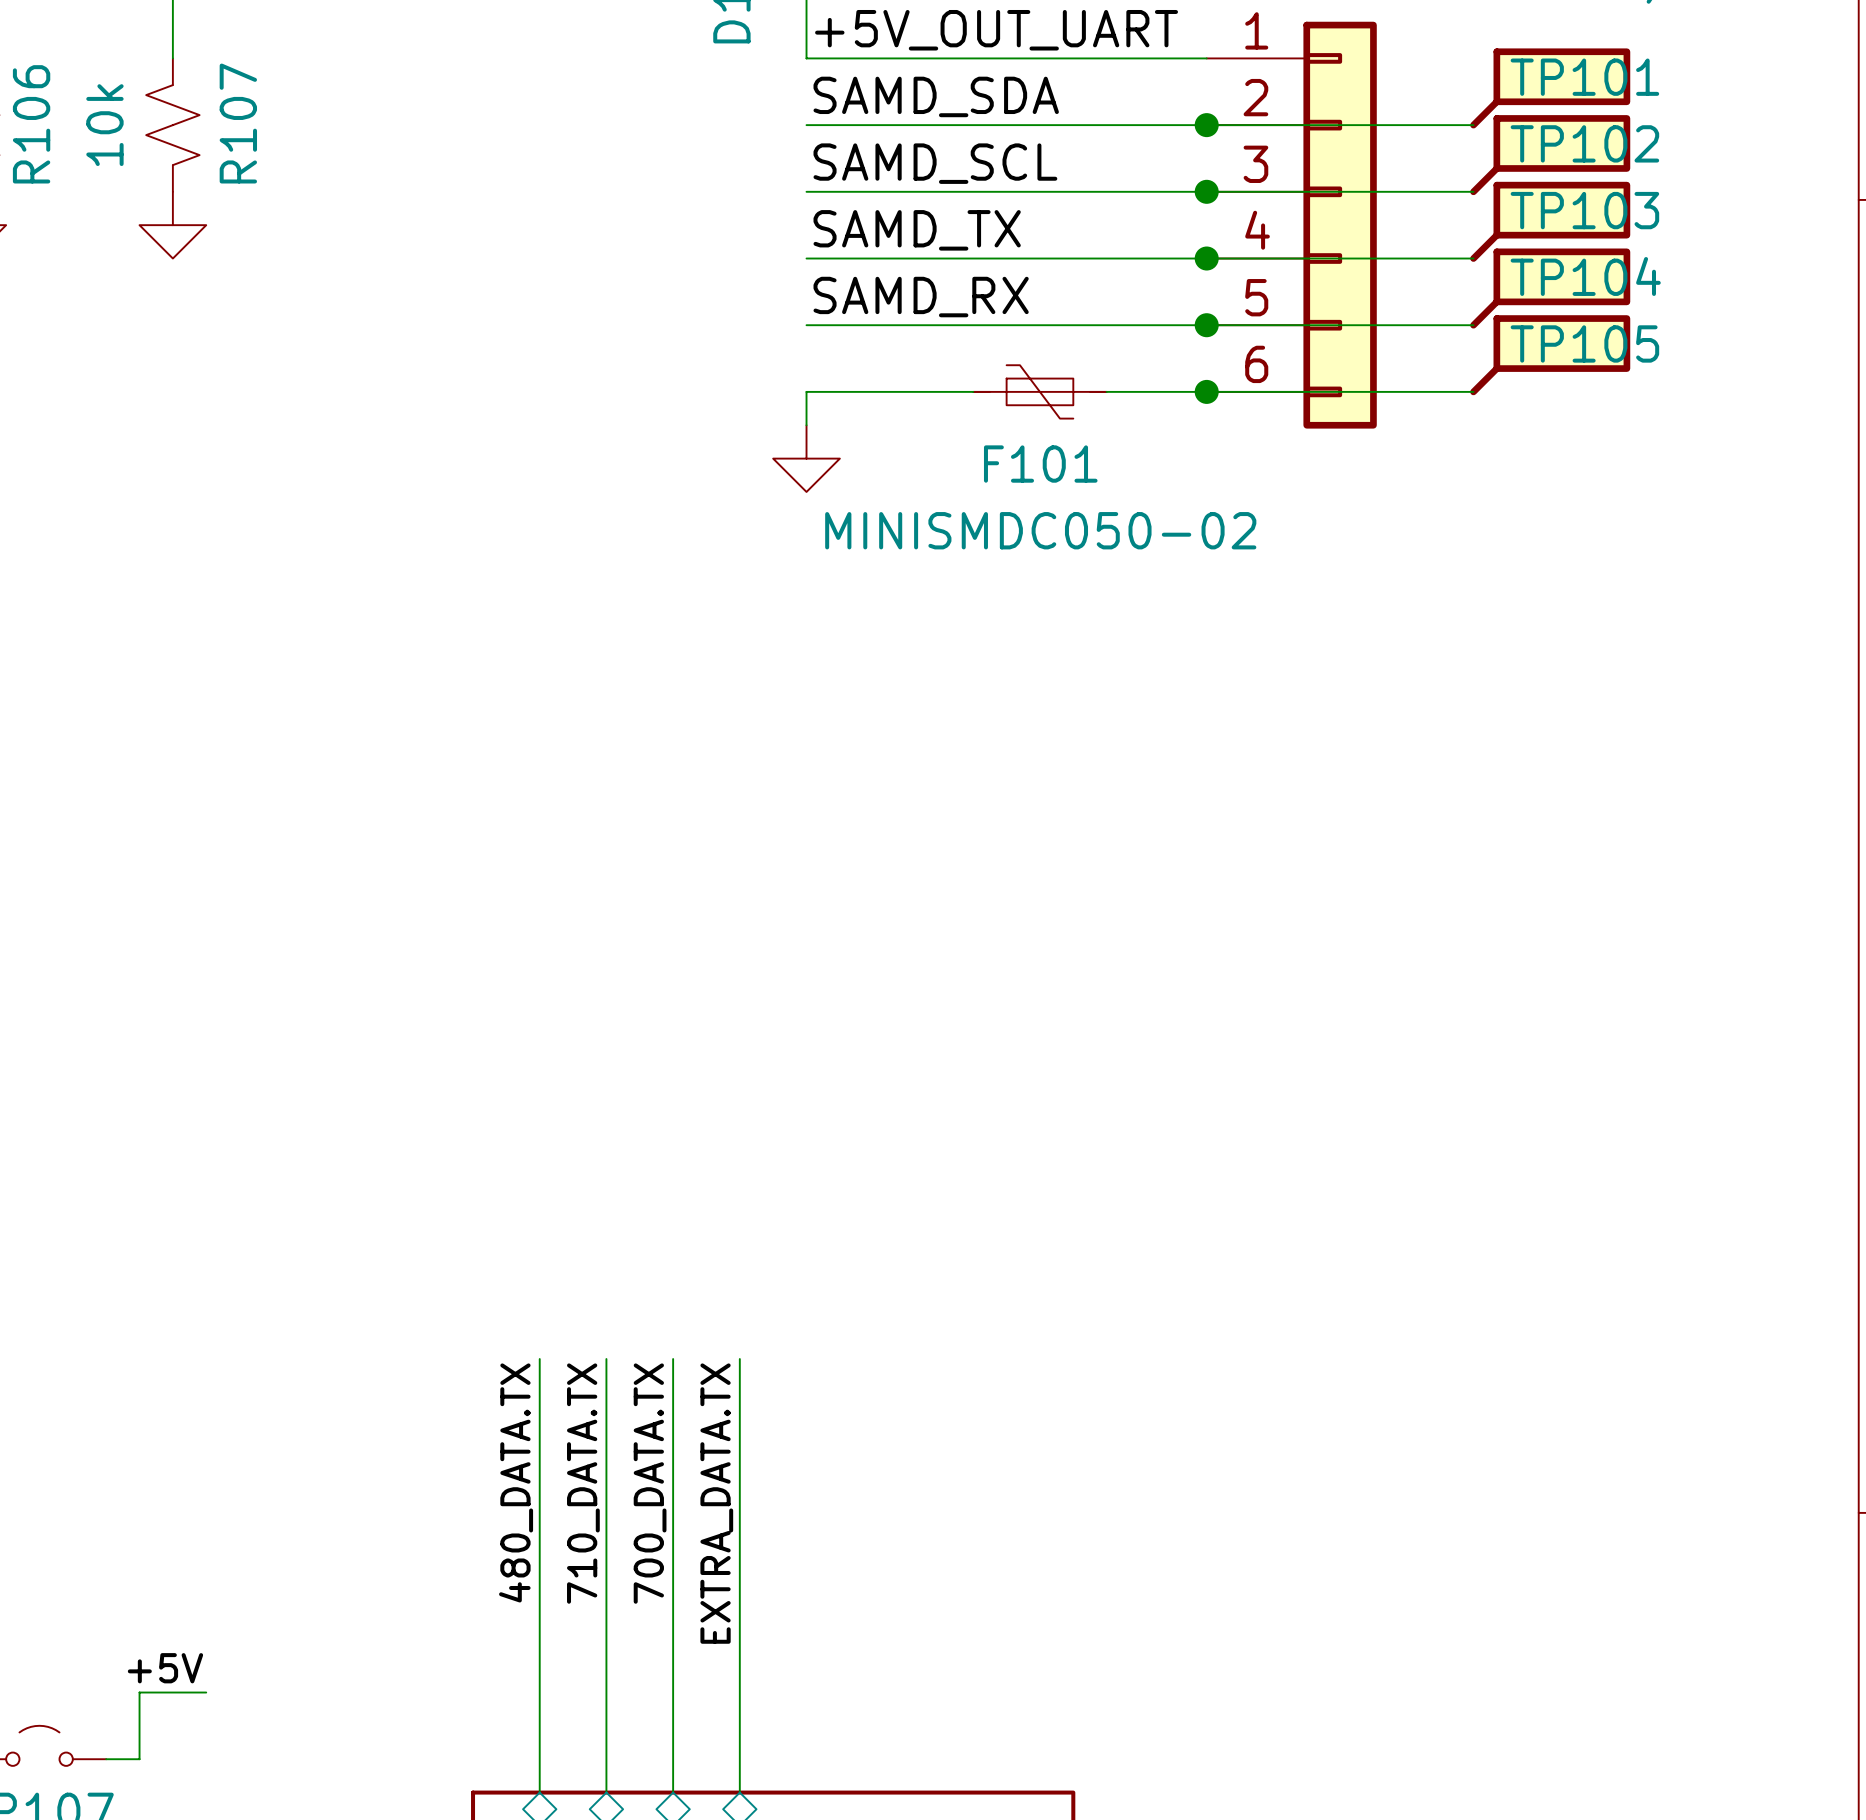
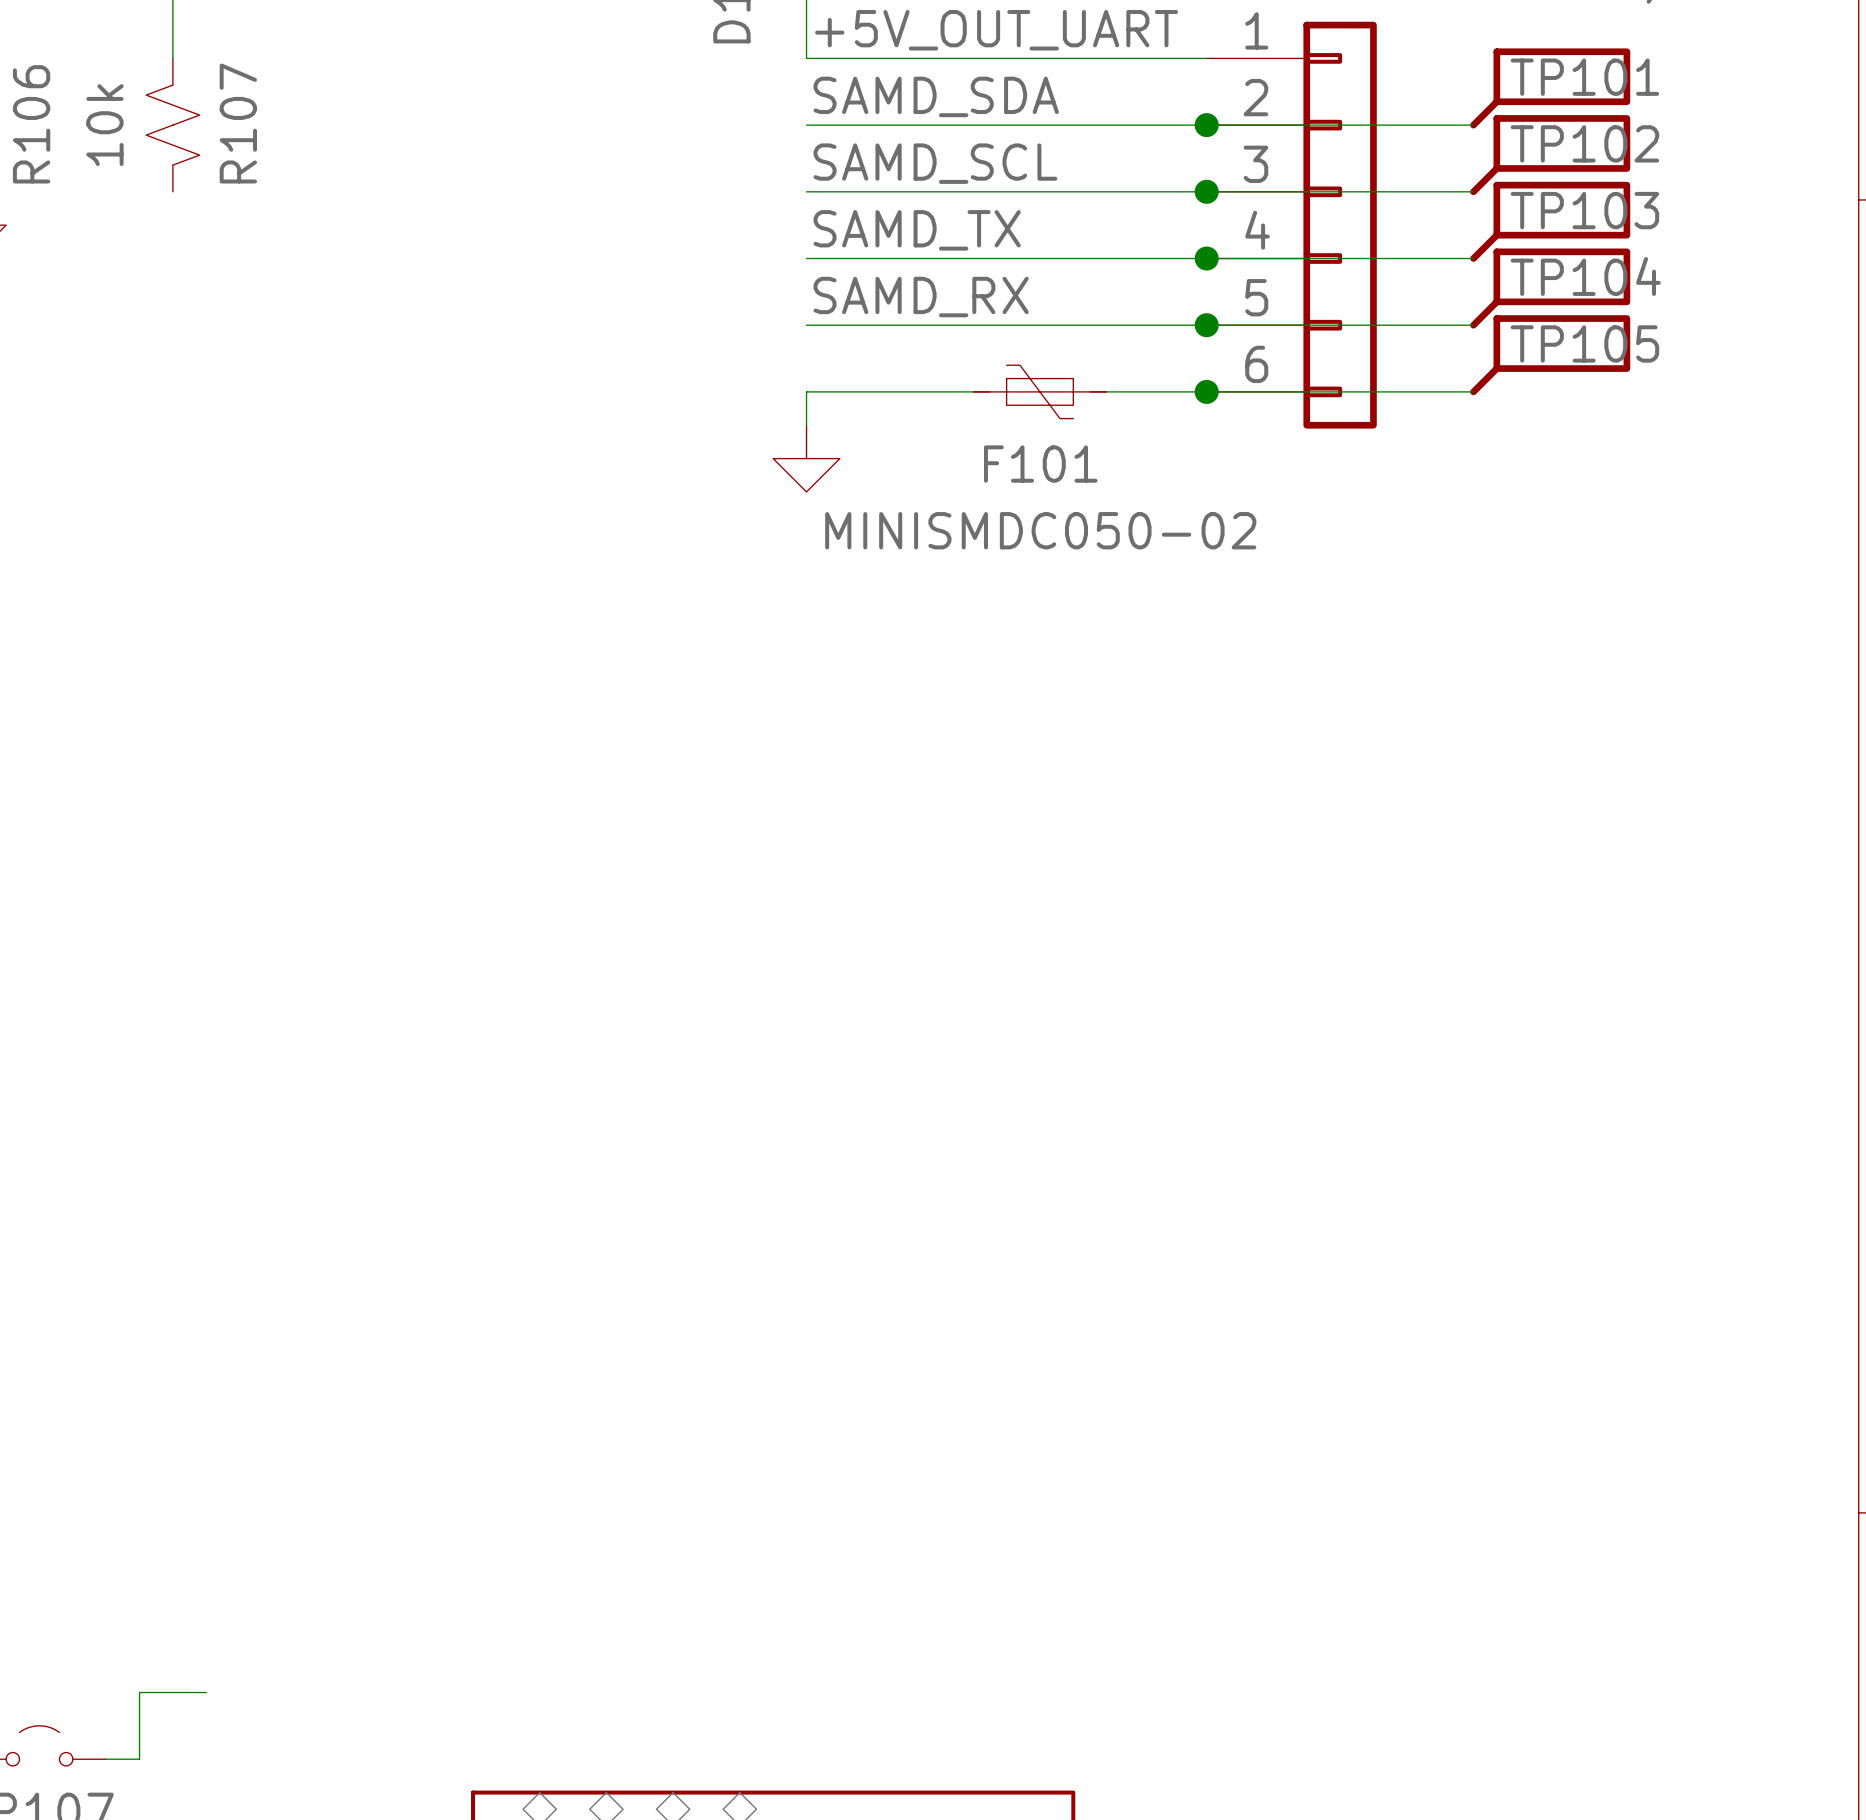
power symbol: (172, 225) -> none
wire: (539, 1359) (539, 1792) -> none
wire: (606, 1359) (606, 1792) -> none
wire: (673, 1359) (673, 1792) -> none
wire: (739, 1359) (739, 1792) -> none
label: 480_DATA.TX (516, 1482) -> none
label: 710_DATA.TX (583, 1483) -> none
label: 700_DATA.TX (650, 1483) -> none
label: EXTRA_DATA.TX (716, 1503) -> none
label: +5V (165, 1668) -> none

